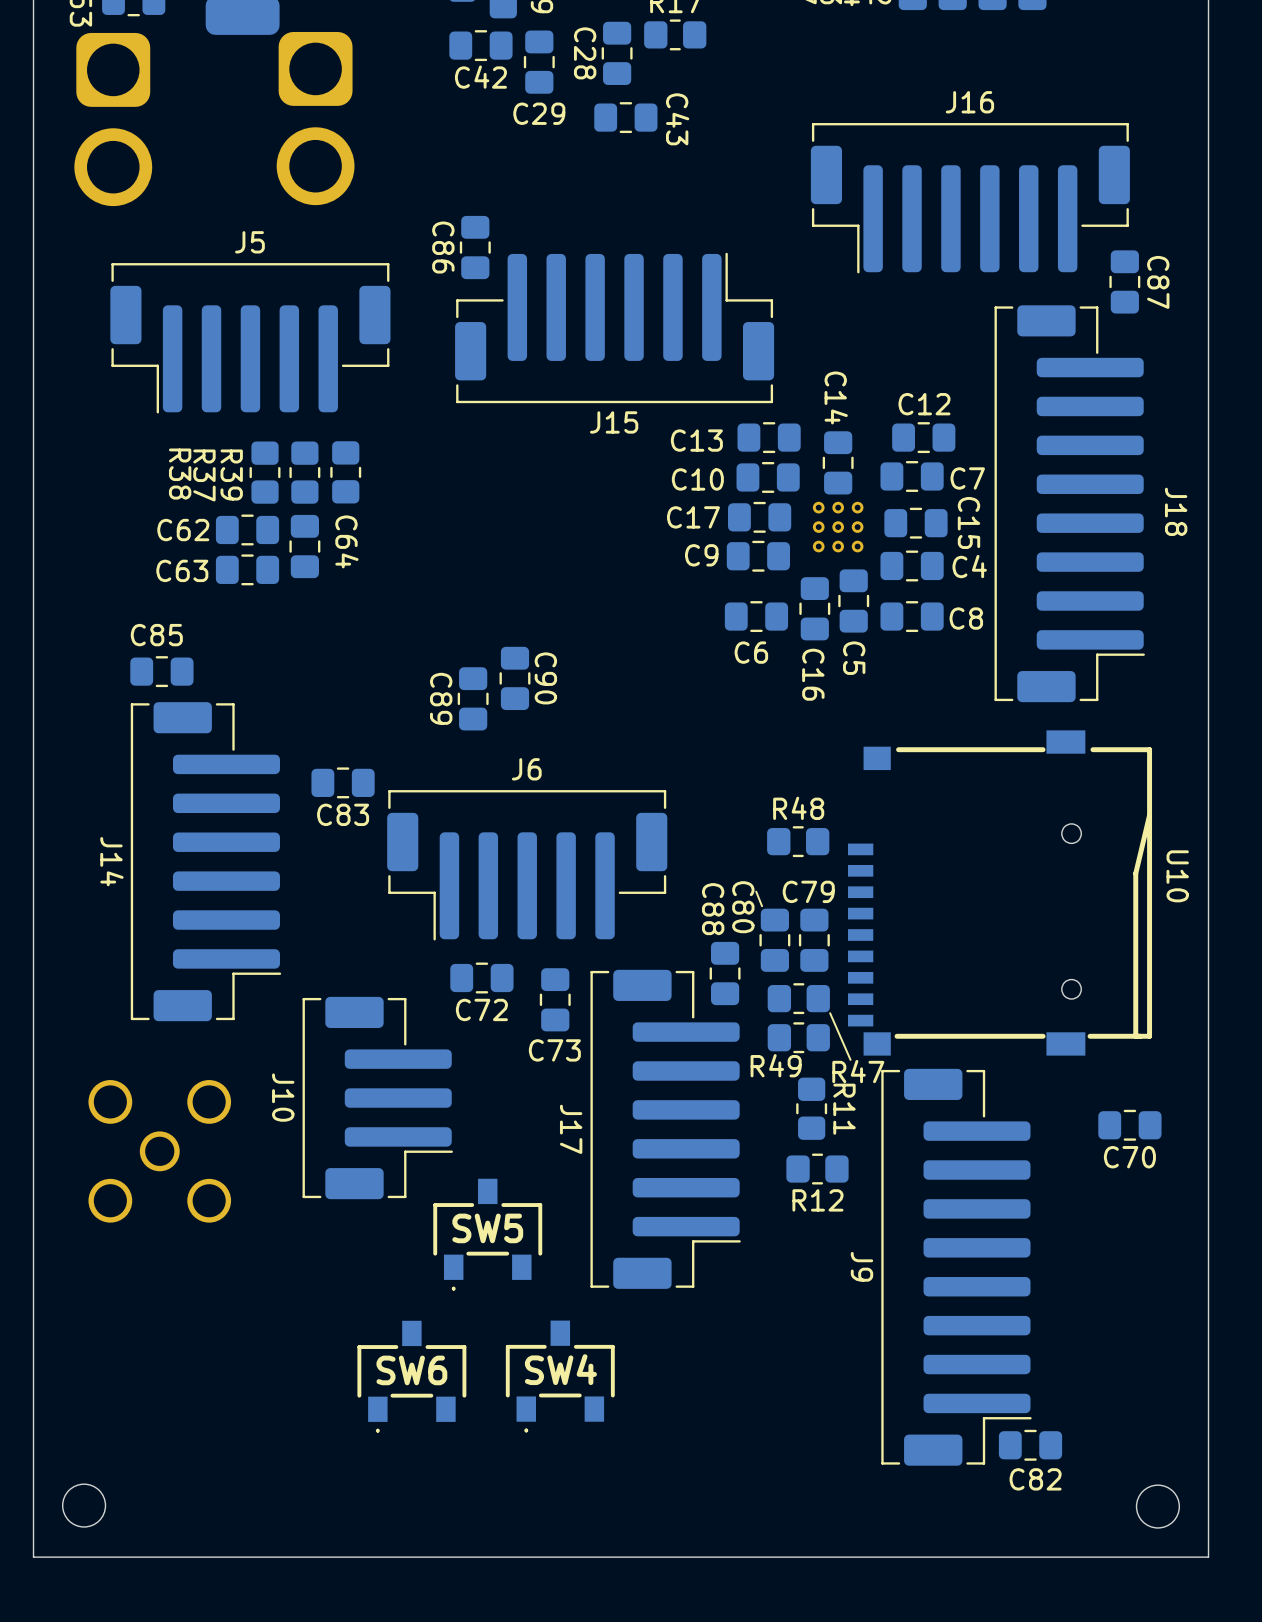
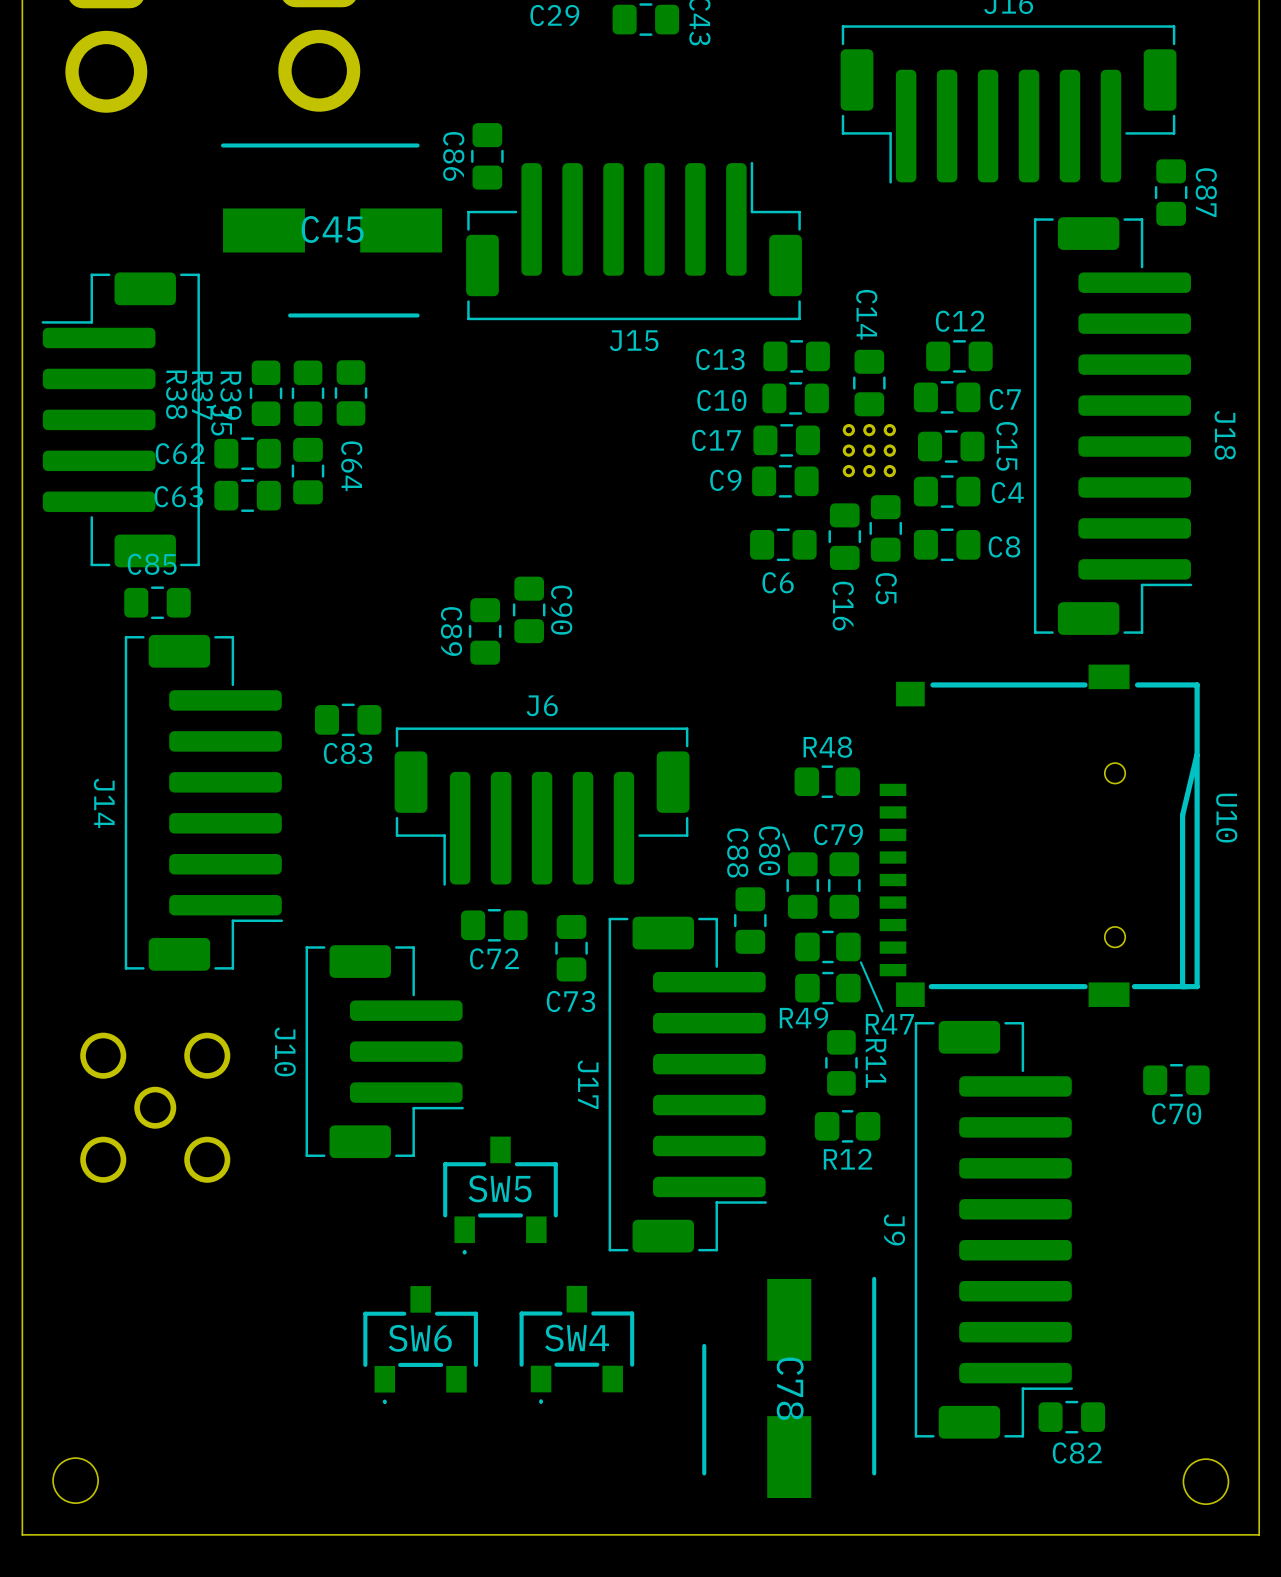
C45: none -> (331, 230)
J5 rotation: 0° (250, 338) -> 90° clockwise (120, 419)
J5 position: (250, 338) -> (120, 419)
C78: none -> (789, 1387)

